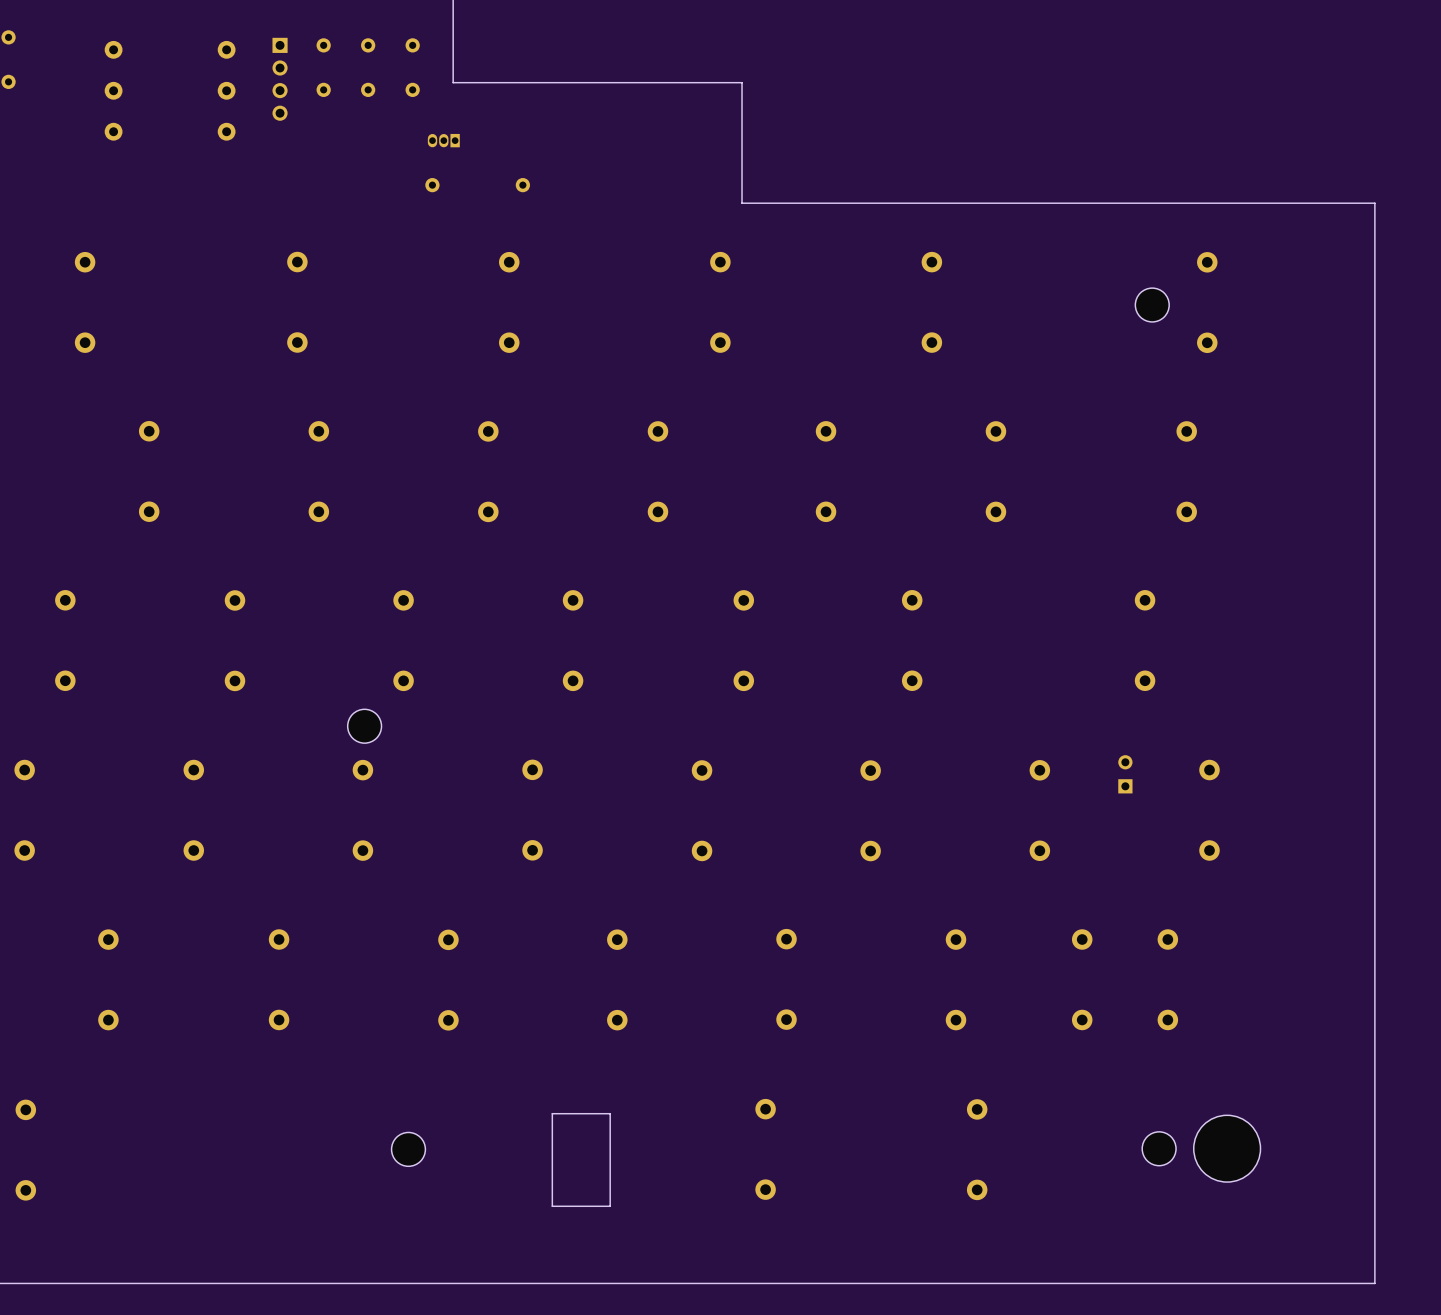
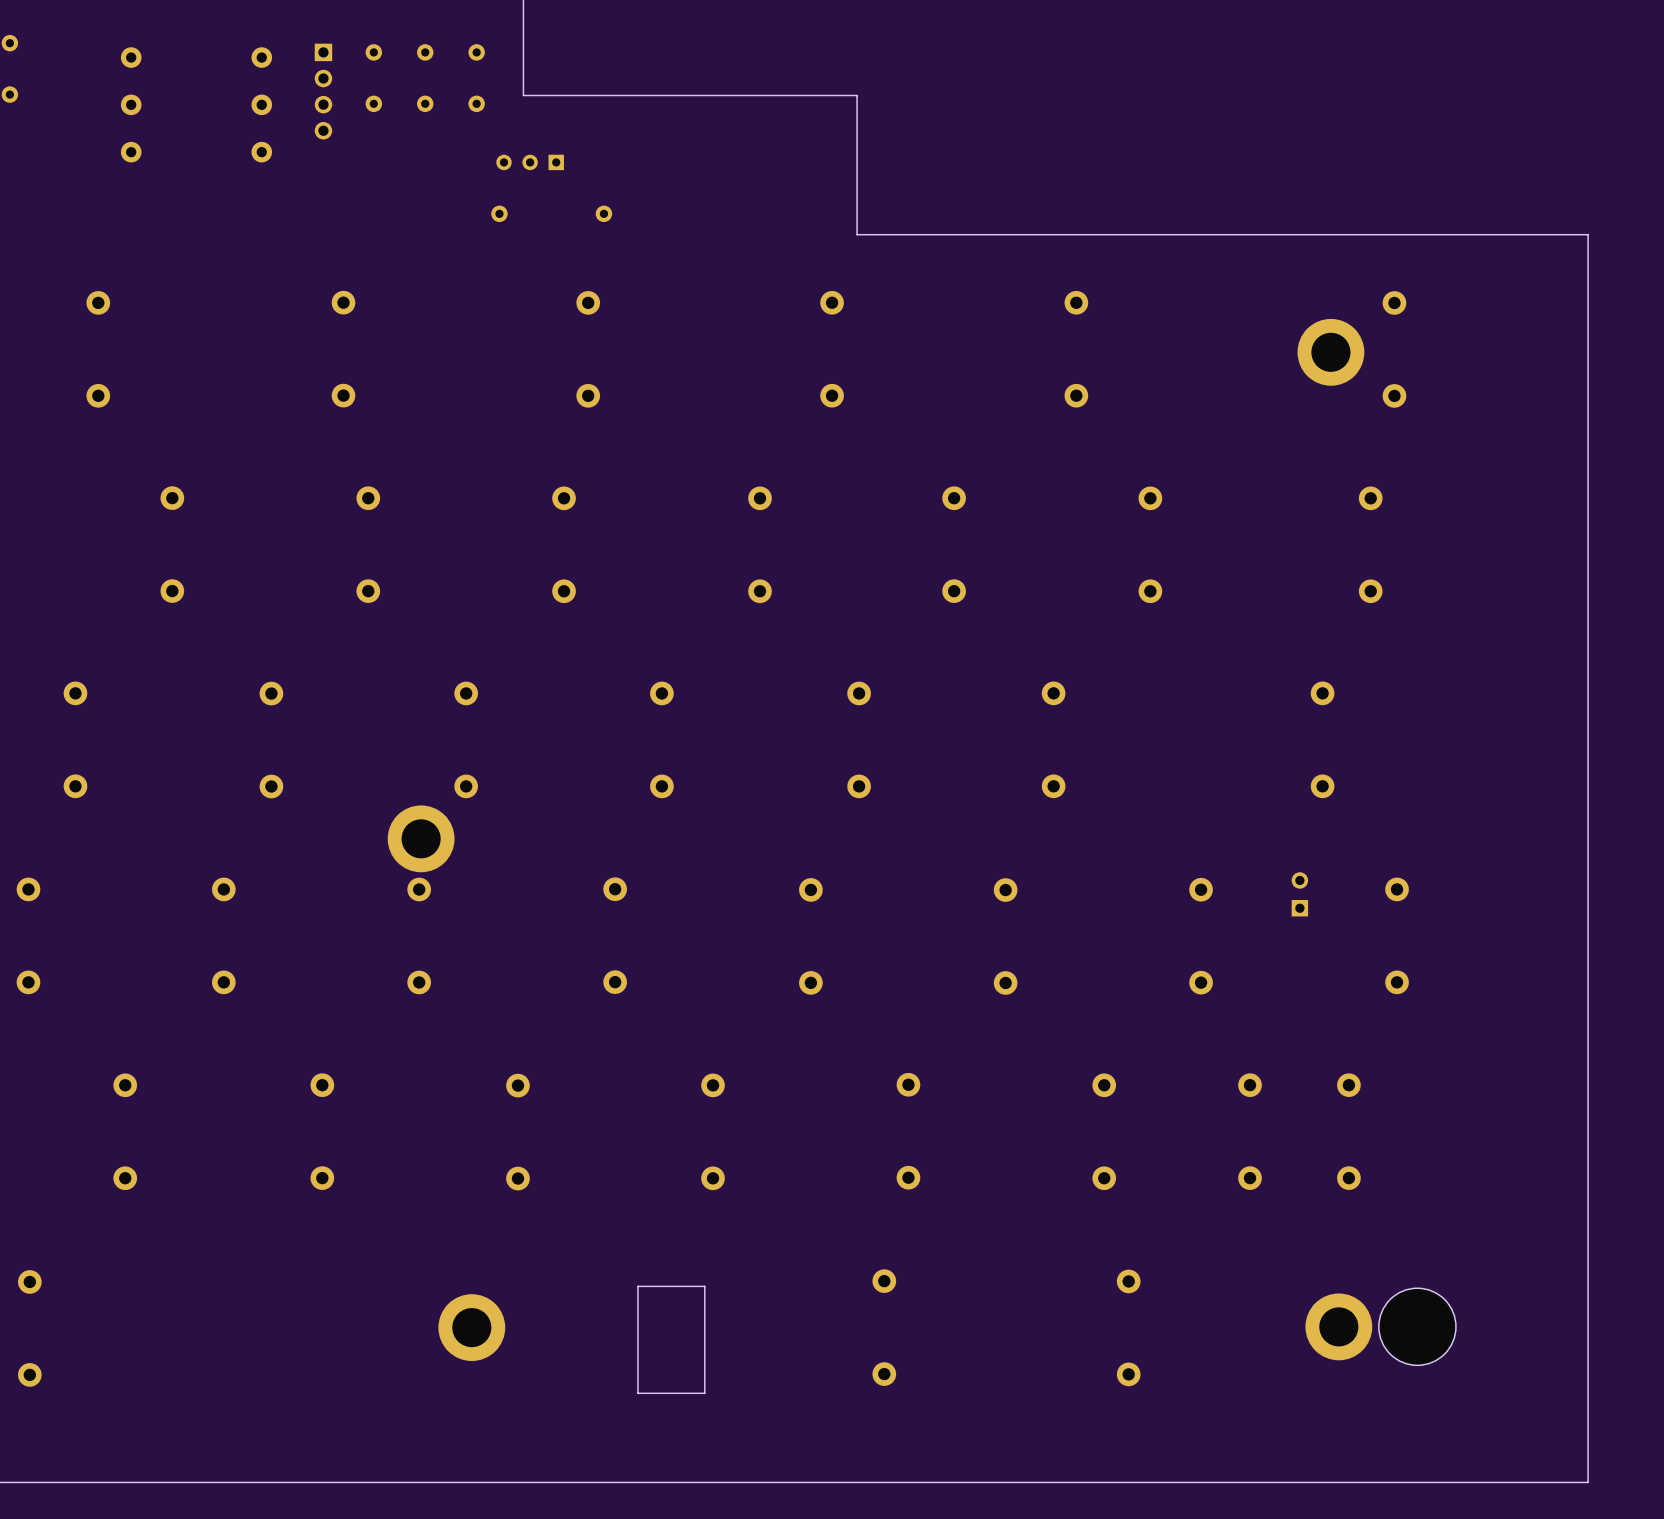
part: (443, 140) -> none
part: none -> (530, 162)
part footprint: [1135, 288, 1170, 322] -> [1297, 318, 1365, 386]
part footprint: [347, 709, 382, 744] -> [387, 805, 455, 873]
part footprint: [1142, 1131, 1177, 1166] -> [1305, 1293, 1373, 1361]
part footprint: [391, 1132, 426, 1167] -> [438, 1294, 506, 1362]

